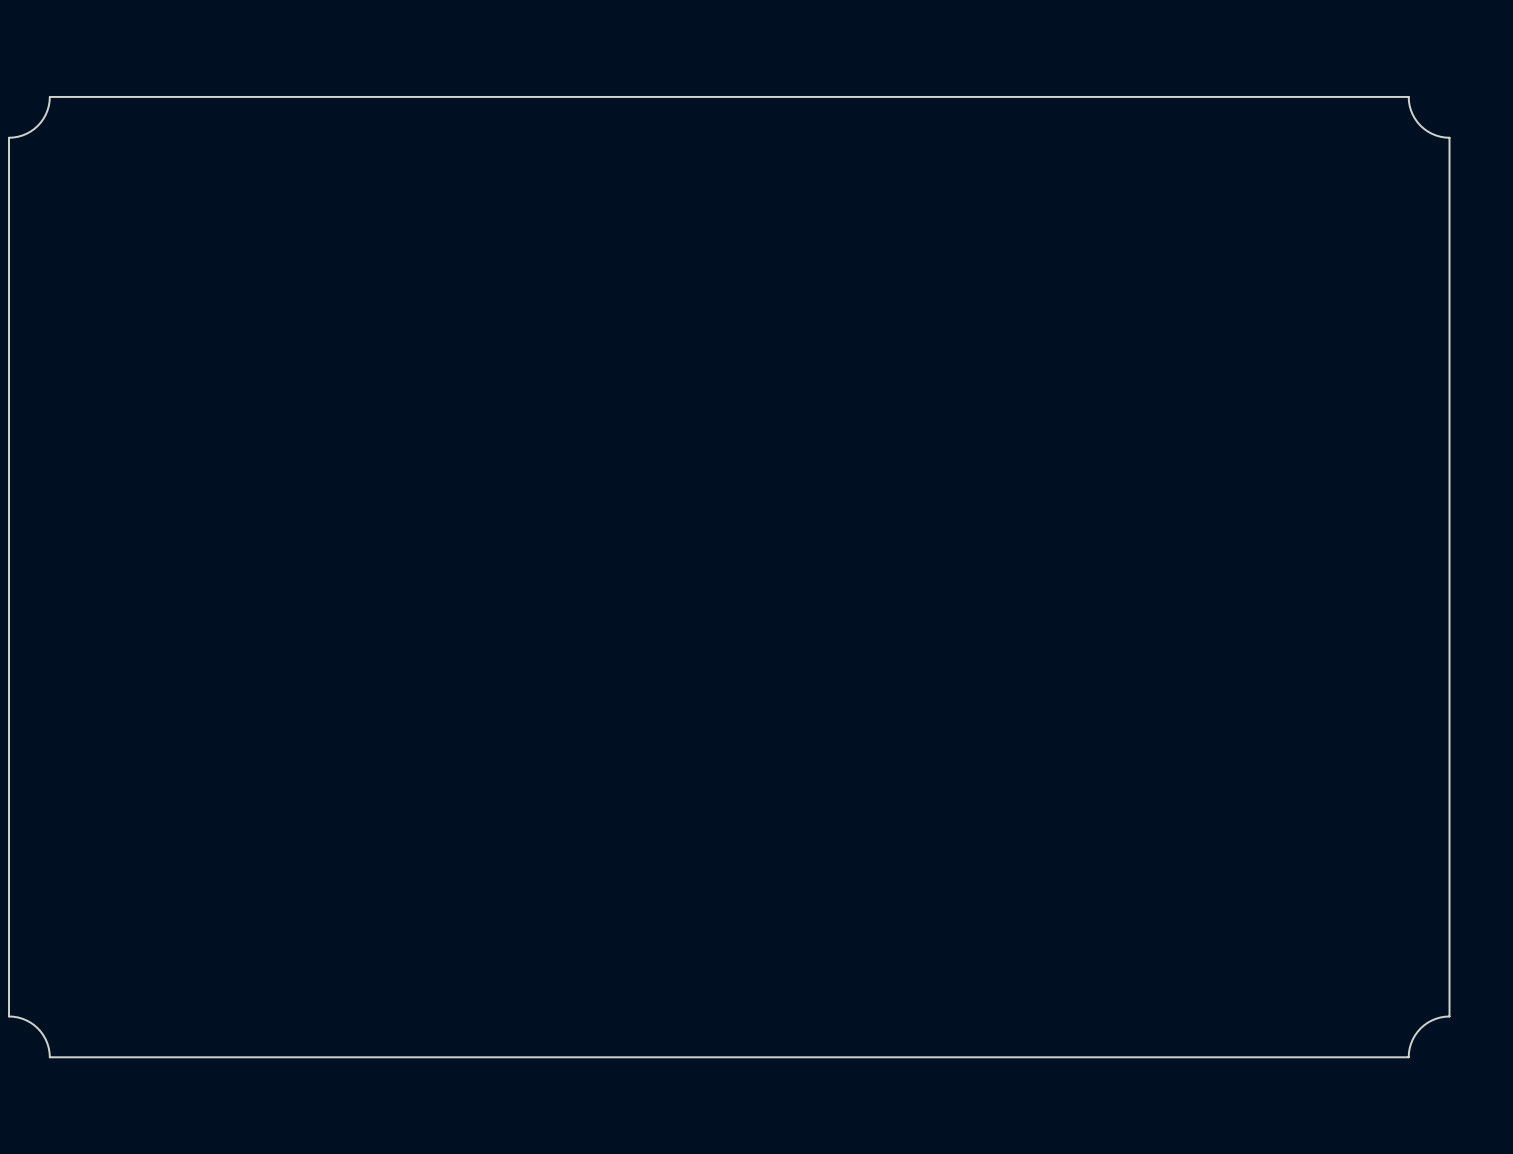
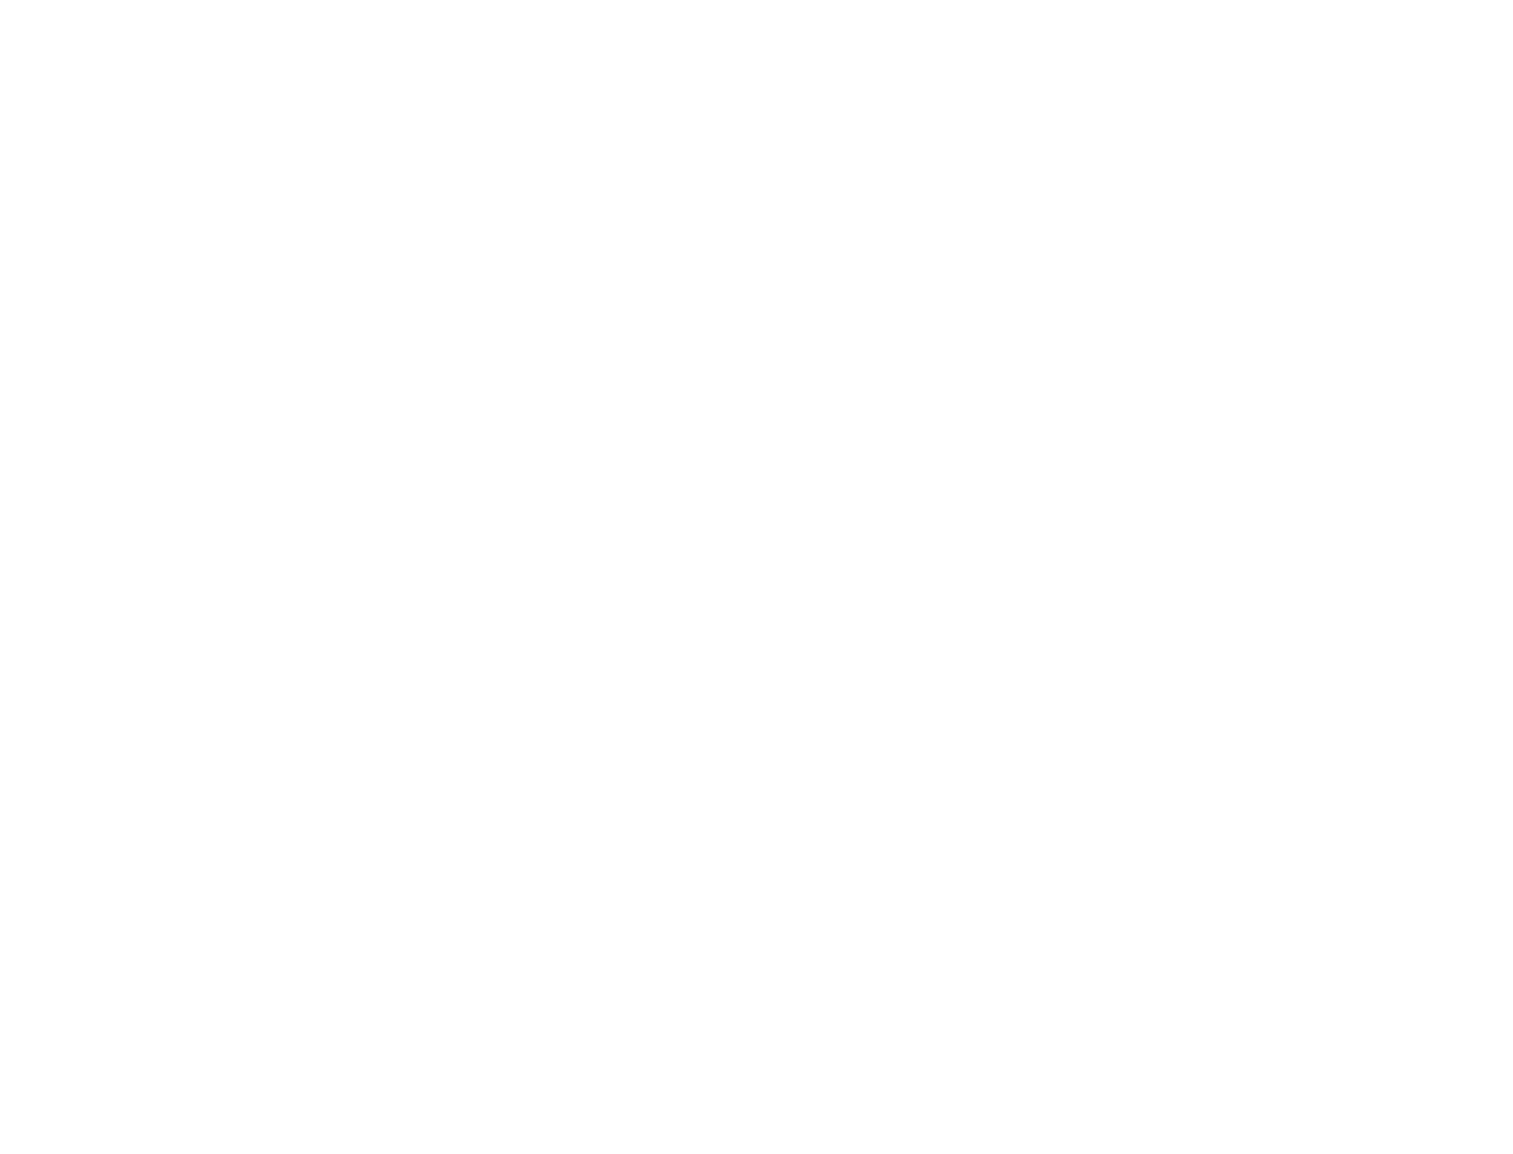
board edge: (49, 96) (1408, 96) (1410, 110) (1420, 125) (1436, 135) (1449, 137) (1449, 1016) (1431, 1020) (1420, 1028) (1410, 1043) (1408, 1057) (49, 1057) (47, 1043) (37, 1028) (26, 1020) (9, 1016) (9, 137) (22, 135) (37, 125) (45, 114) (49, 96) -> none

